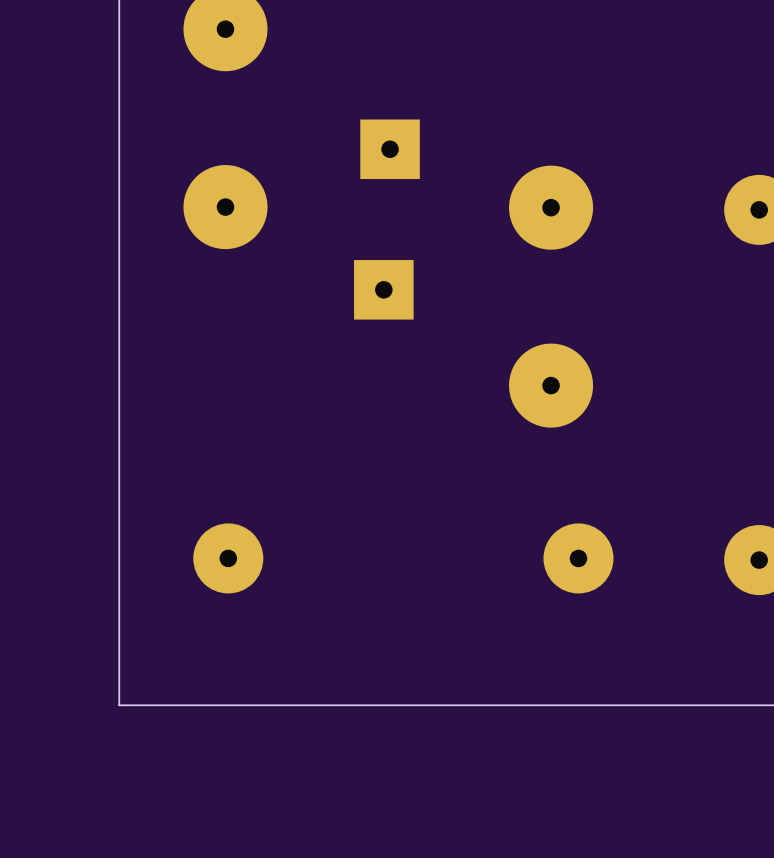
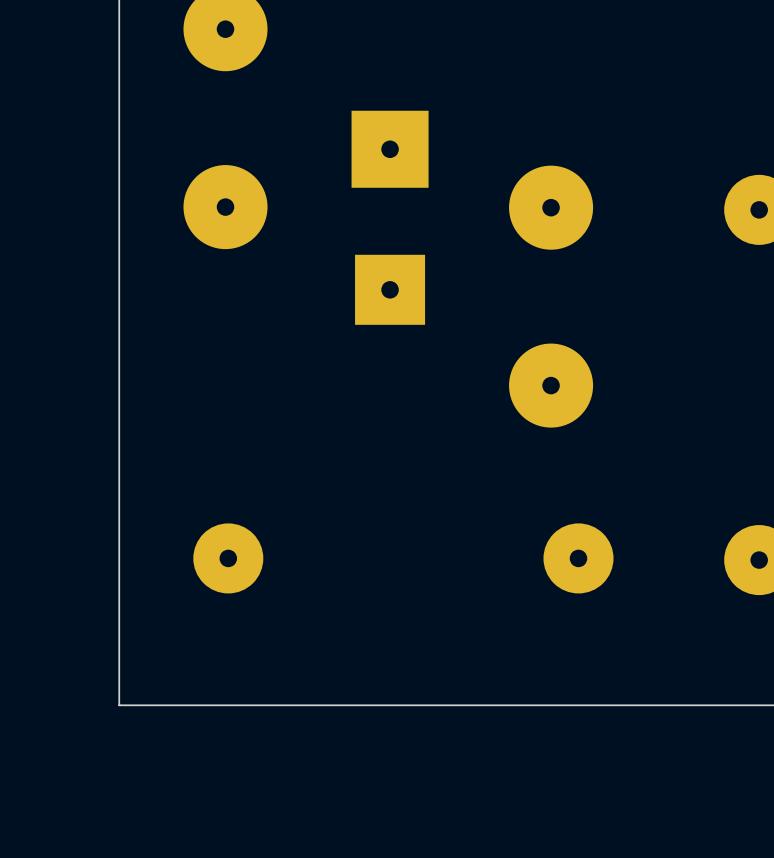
part footprint: [360, 119, 420, 180] -> [351, 110, 429, 188]
part footprint: [354, 260, 414, 320] -> [355, 254, 426, 325]

